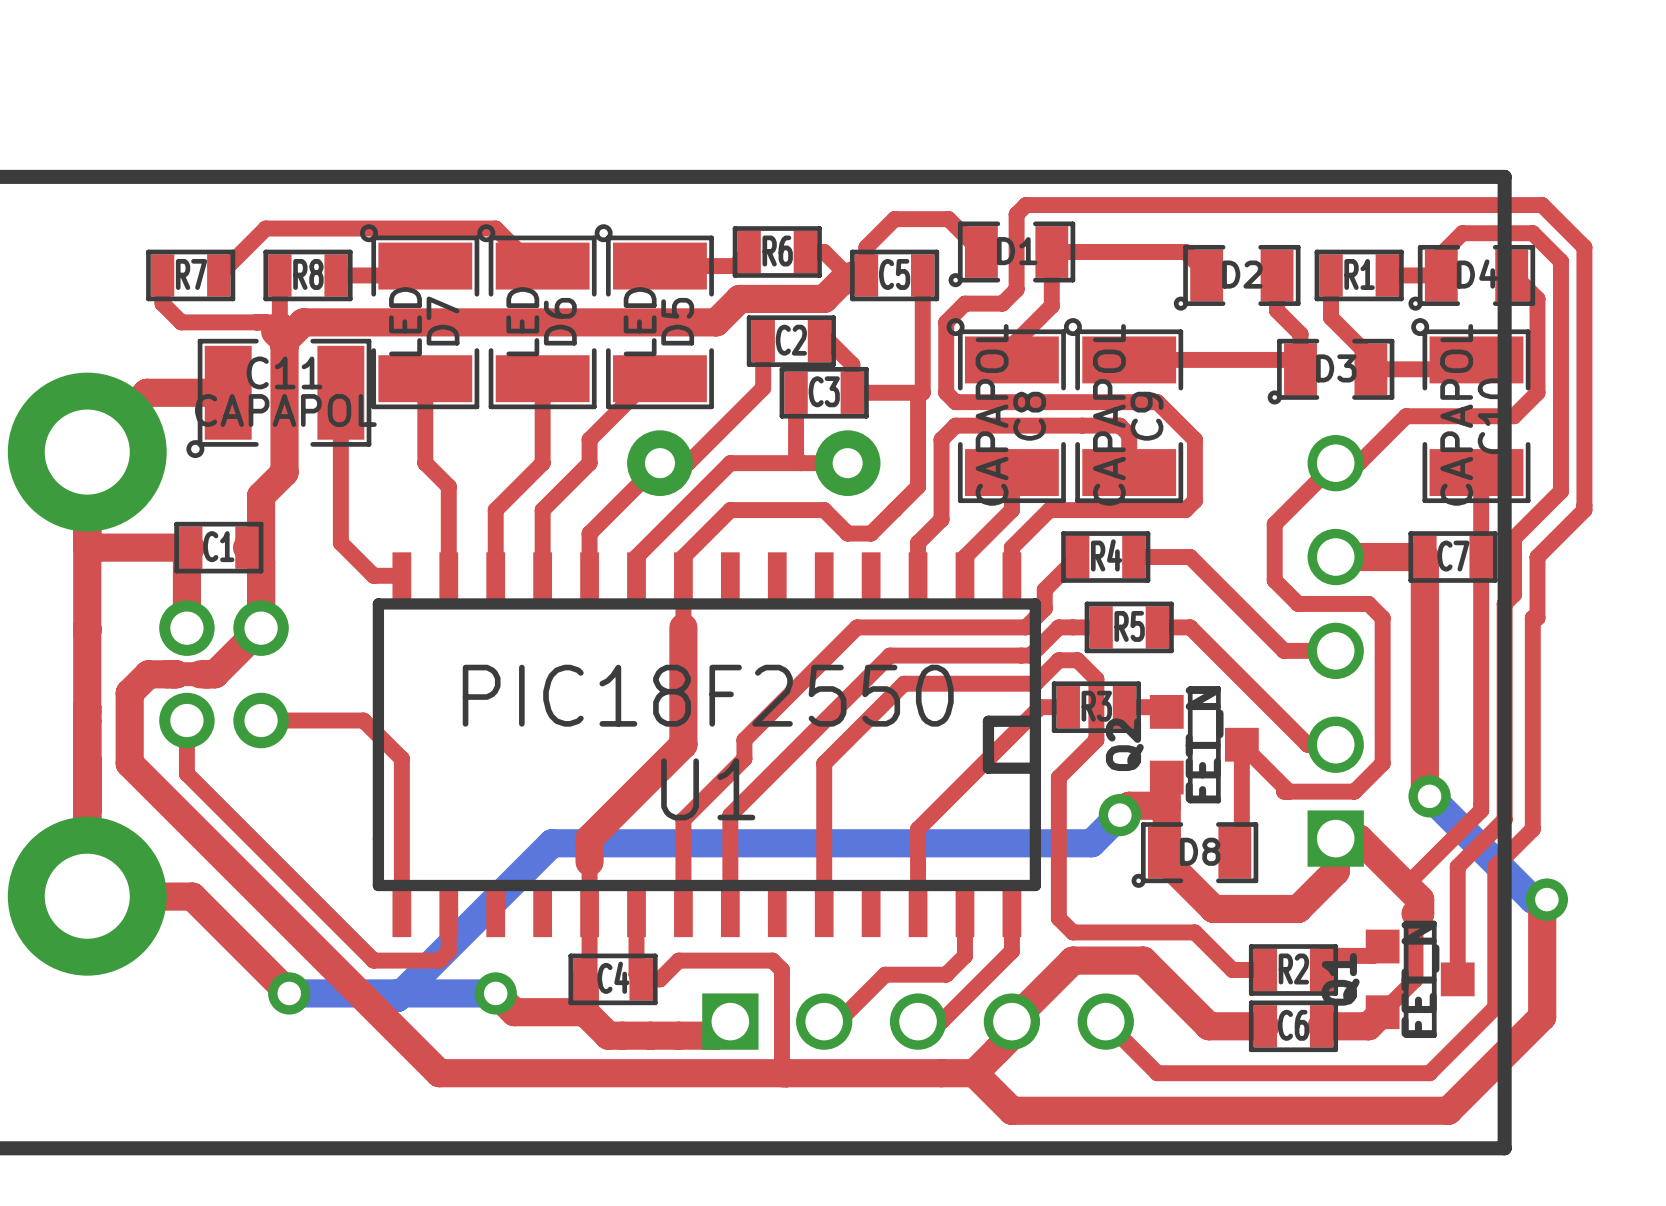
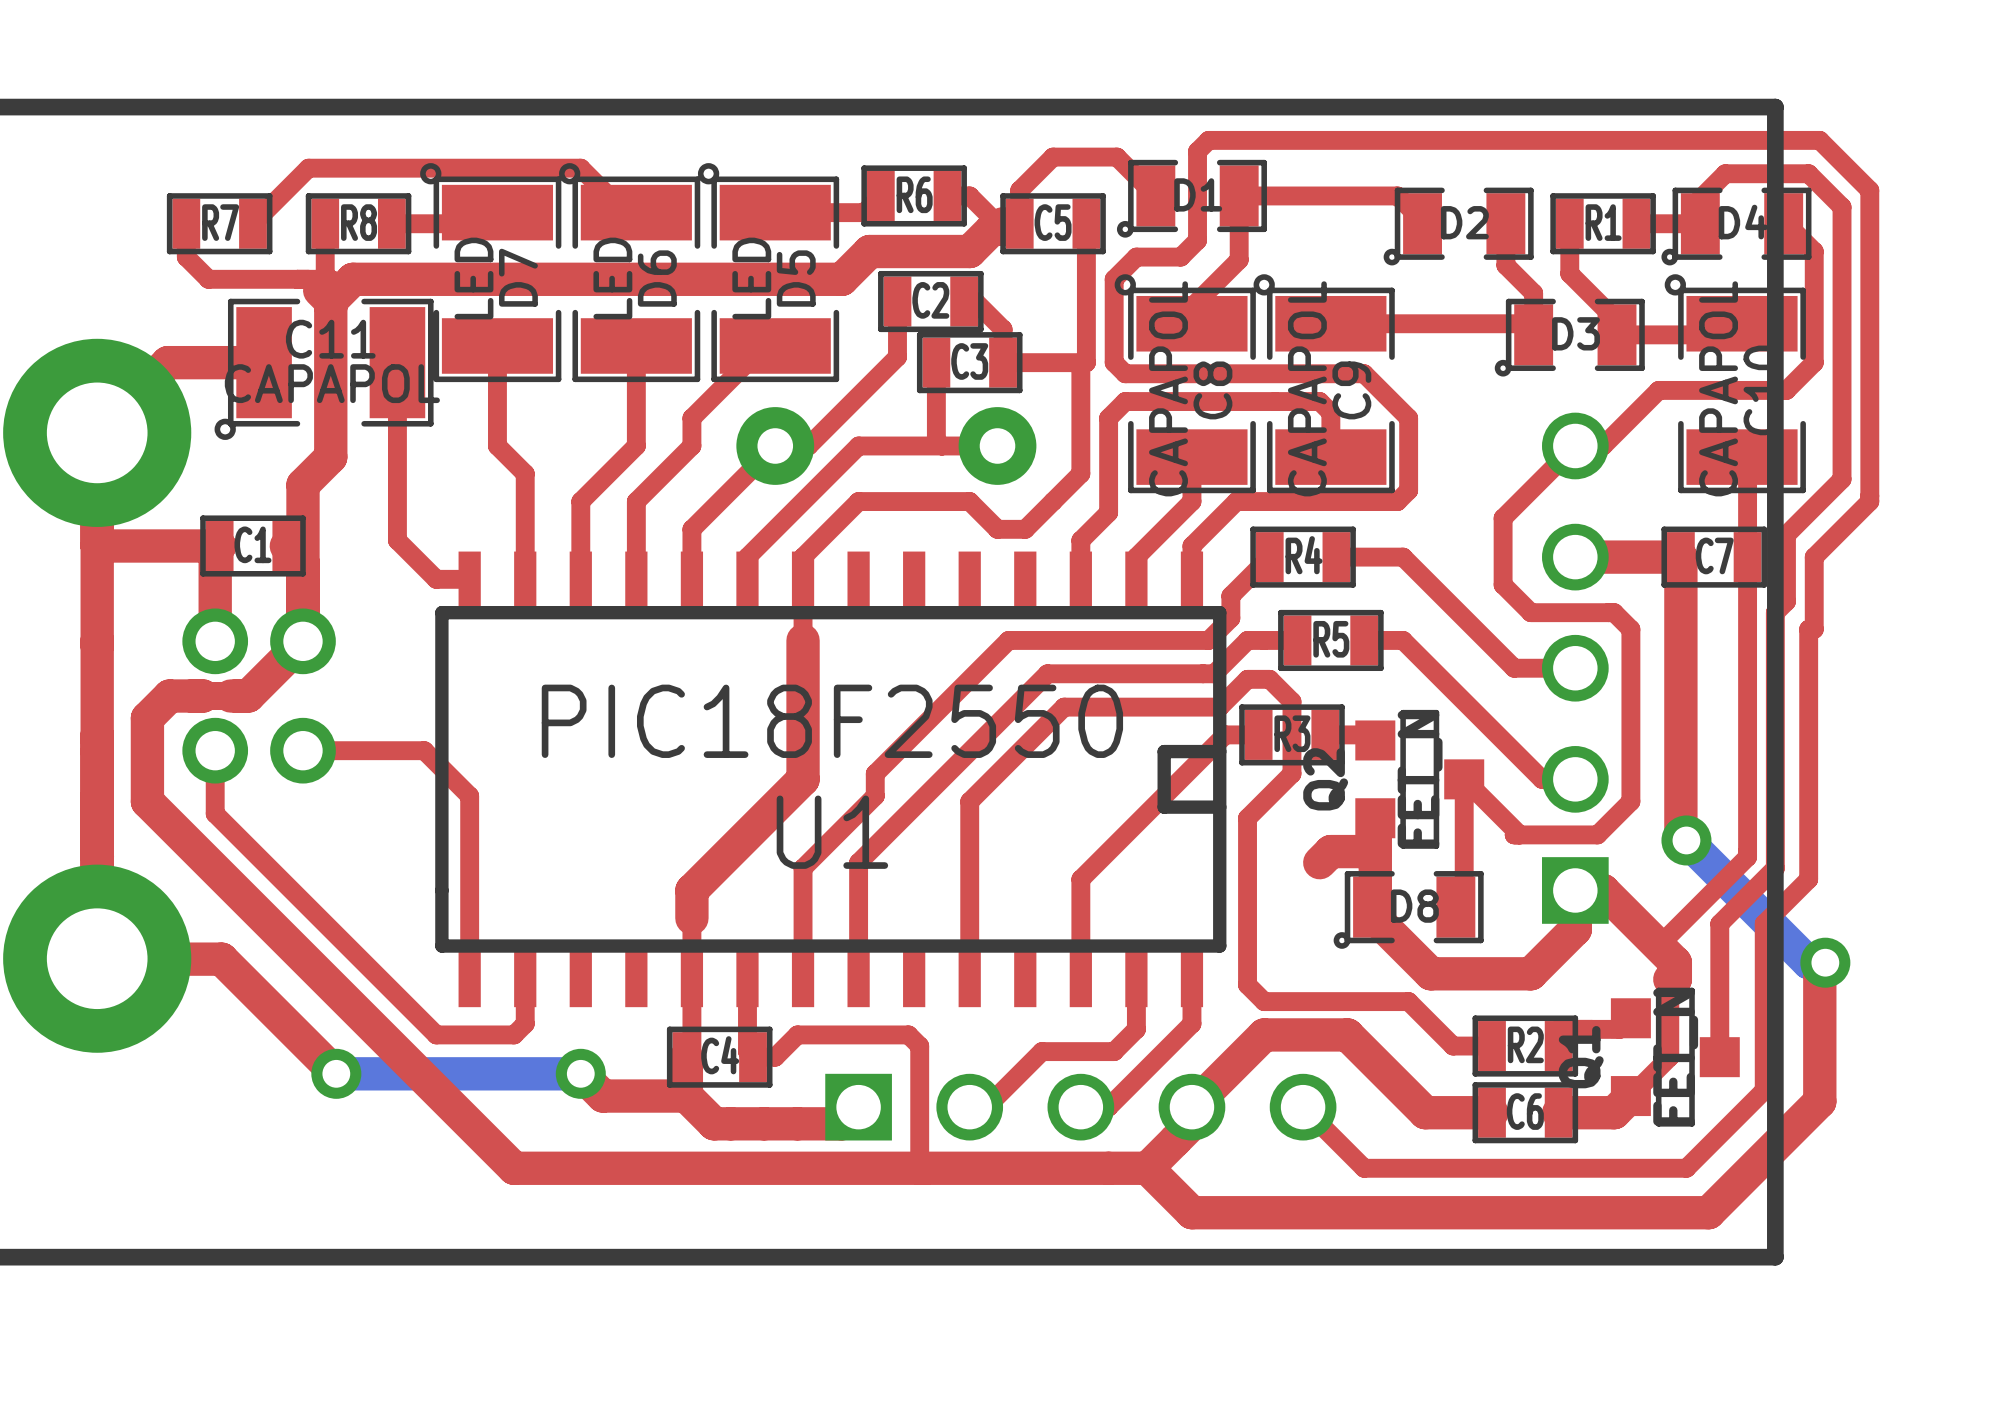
bottom track: (1119, 815) (1091, 843) (552, 843) (397, 998) (397, 993) -> none
via: (1119, 815) -> none

